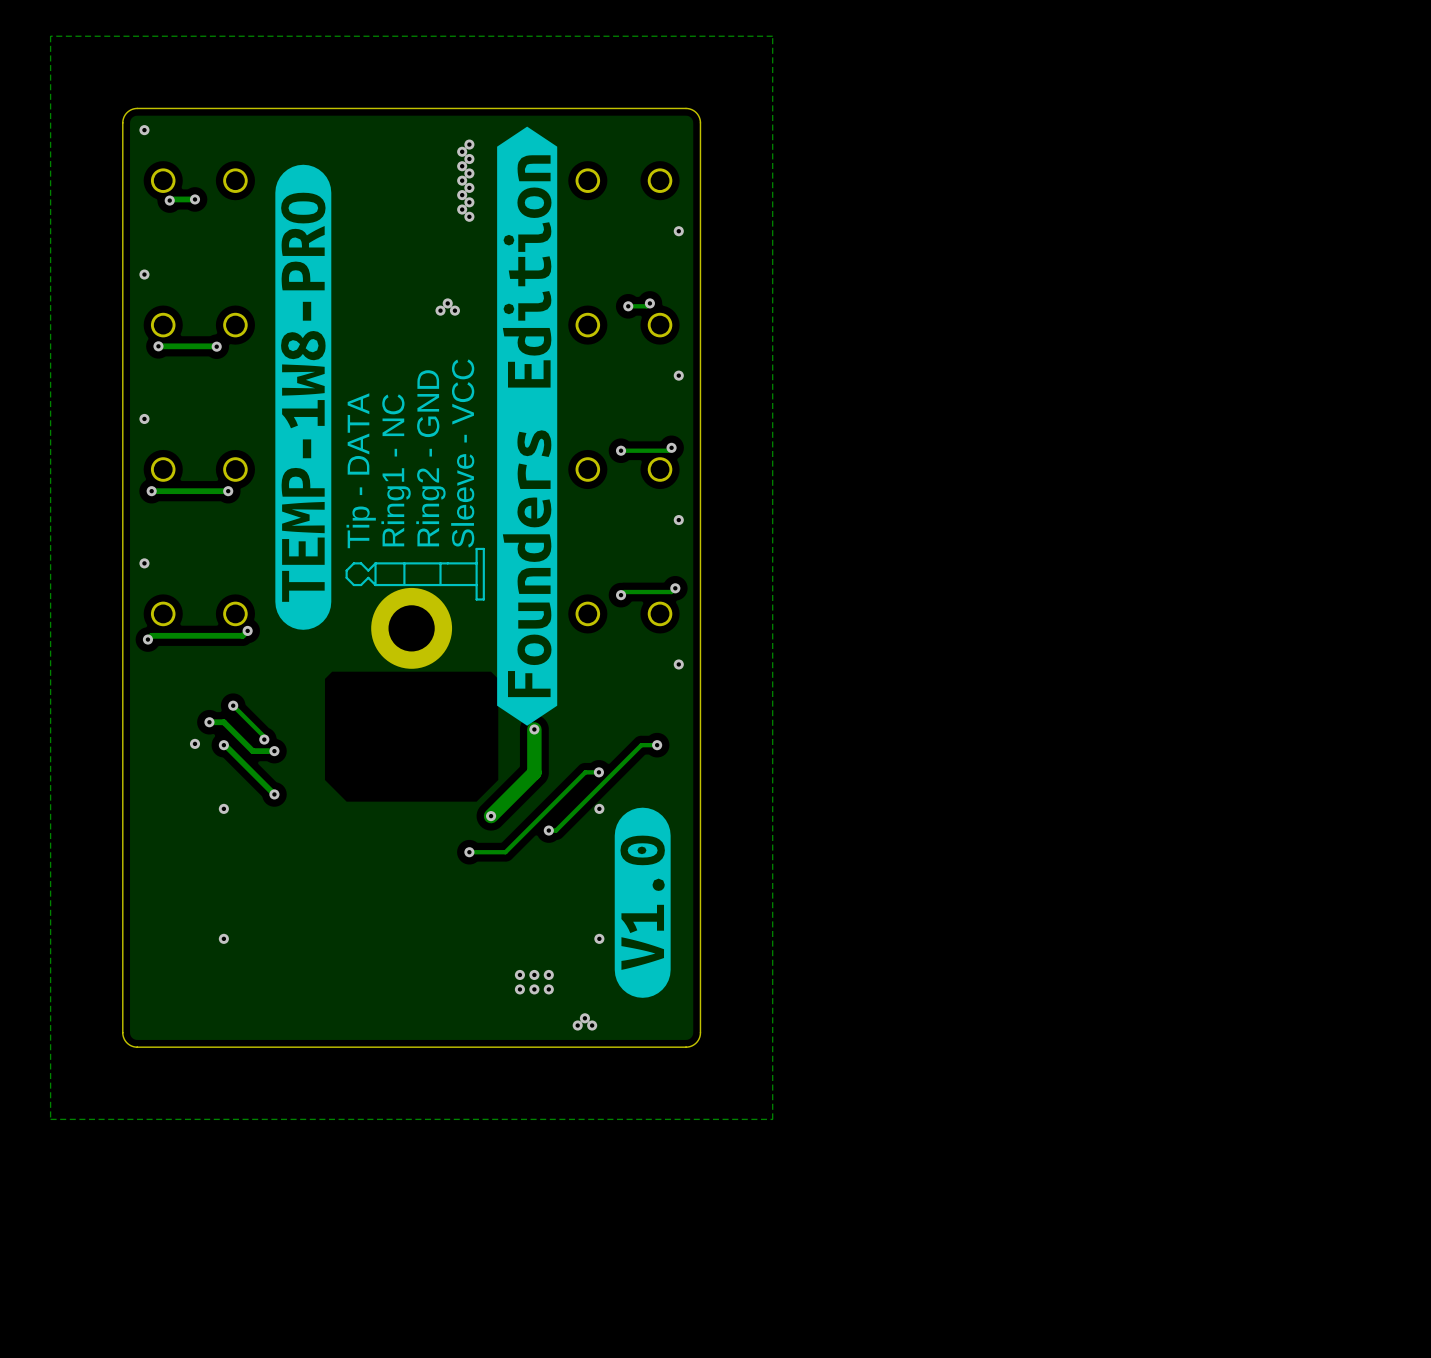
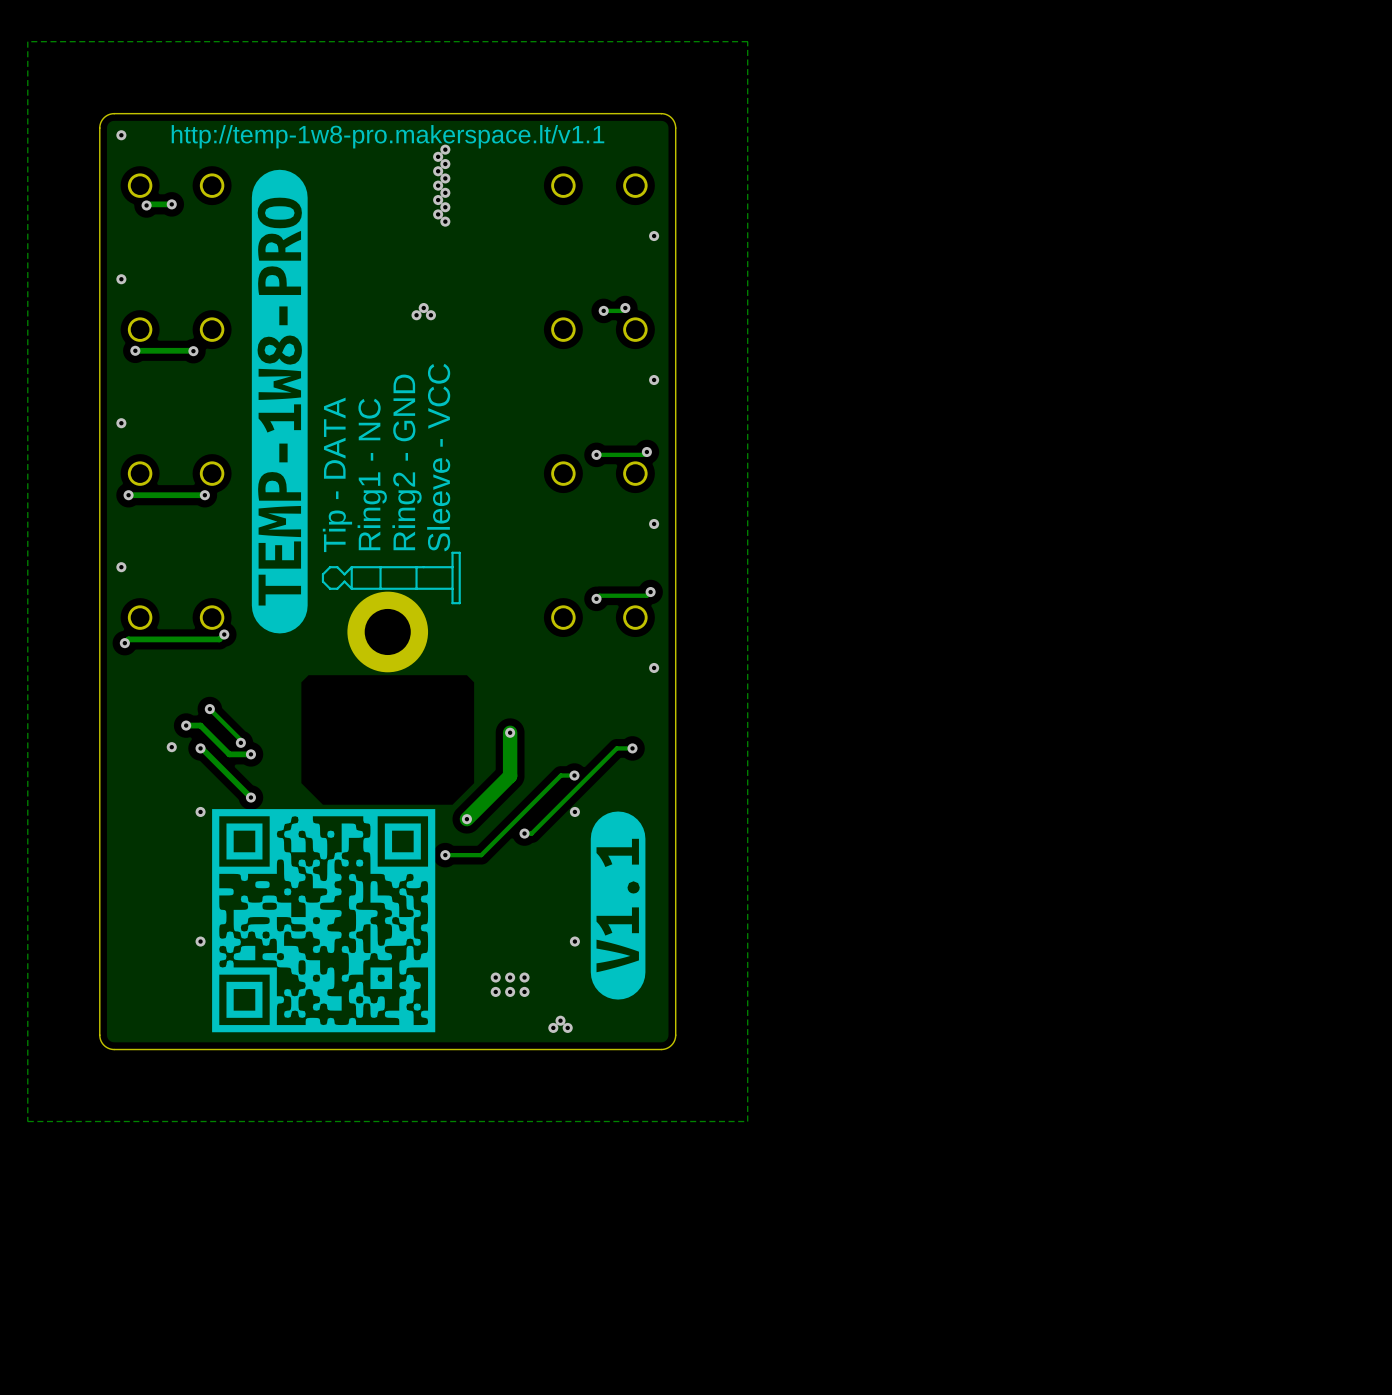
drawing: [497, 126, 558, 726] -> none
text: none -> http://temp-1w8-pro.makerspace.lt/v1.1 (388, 136)
drawing: none -> [212, 809, 436, 1033]
drawing shape: [614, 807, 671, 998] -> [590, 811, 646, 1000]

